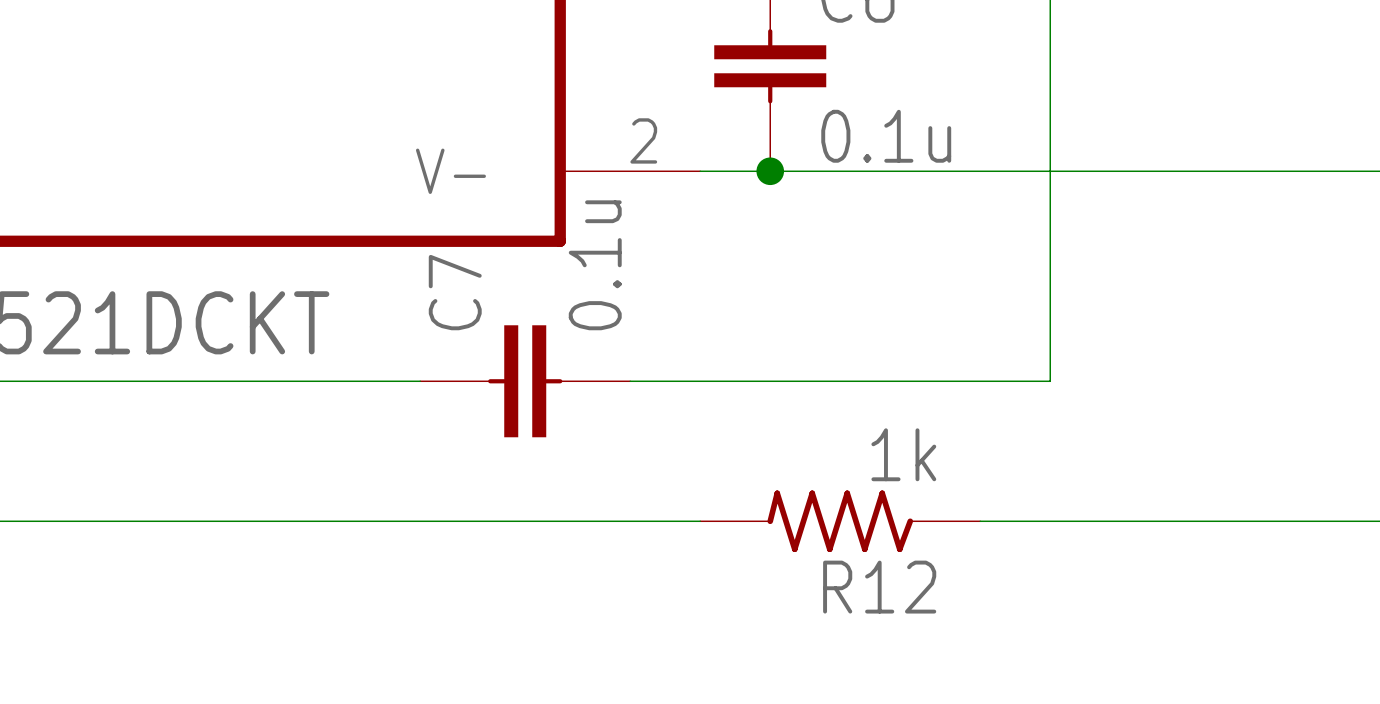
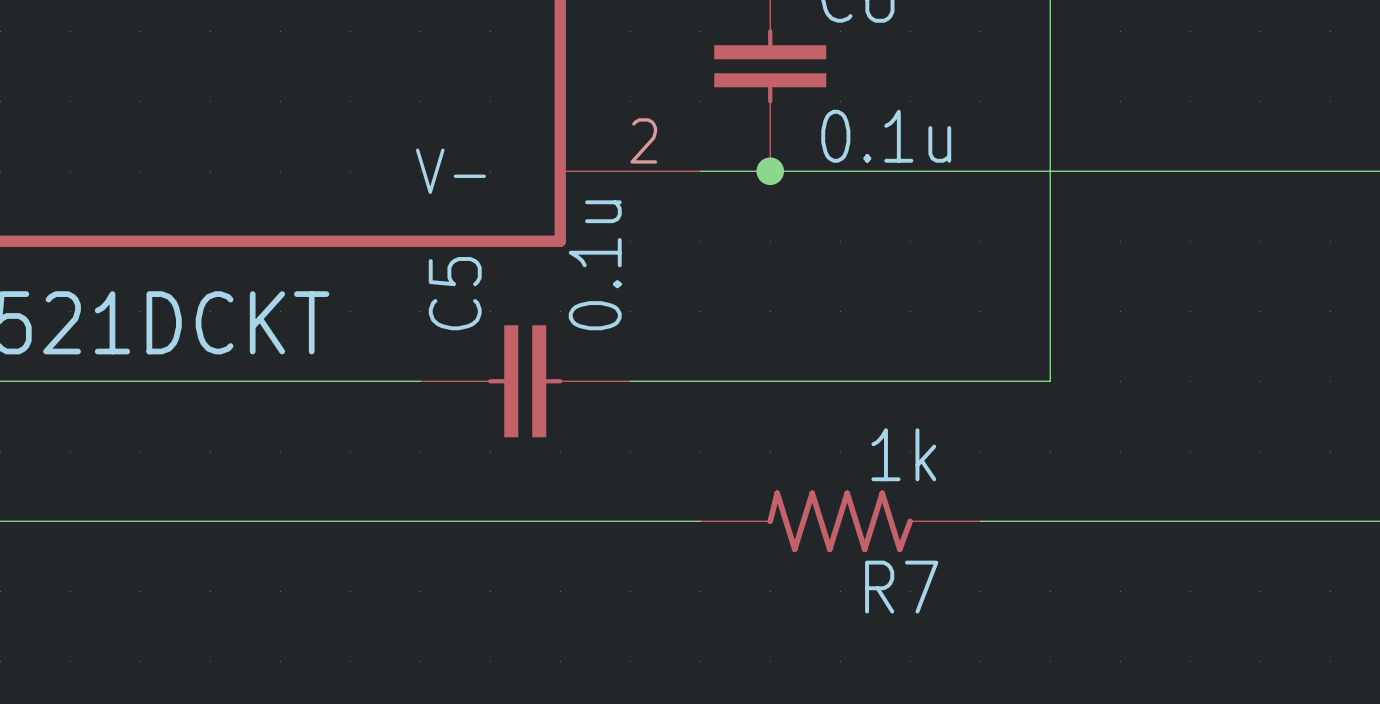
C7 name: C7 (455, 292) -> C5 (455, 293)
R12 name: R12 (879, 587) -> R7 (901, 587)

